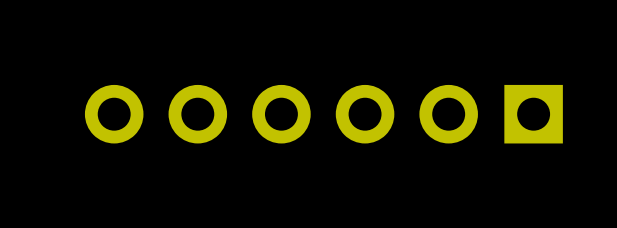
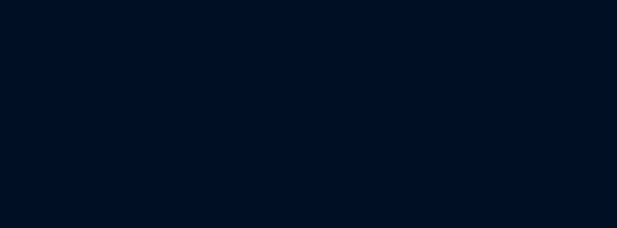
part: (323, 114) -> none

